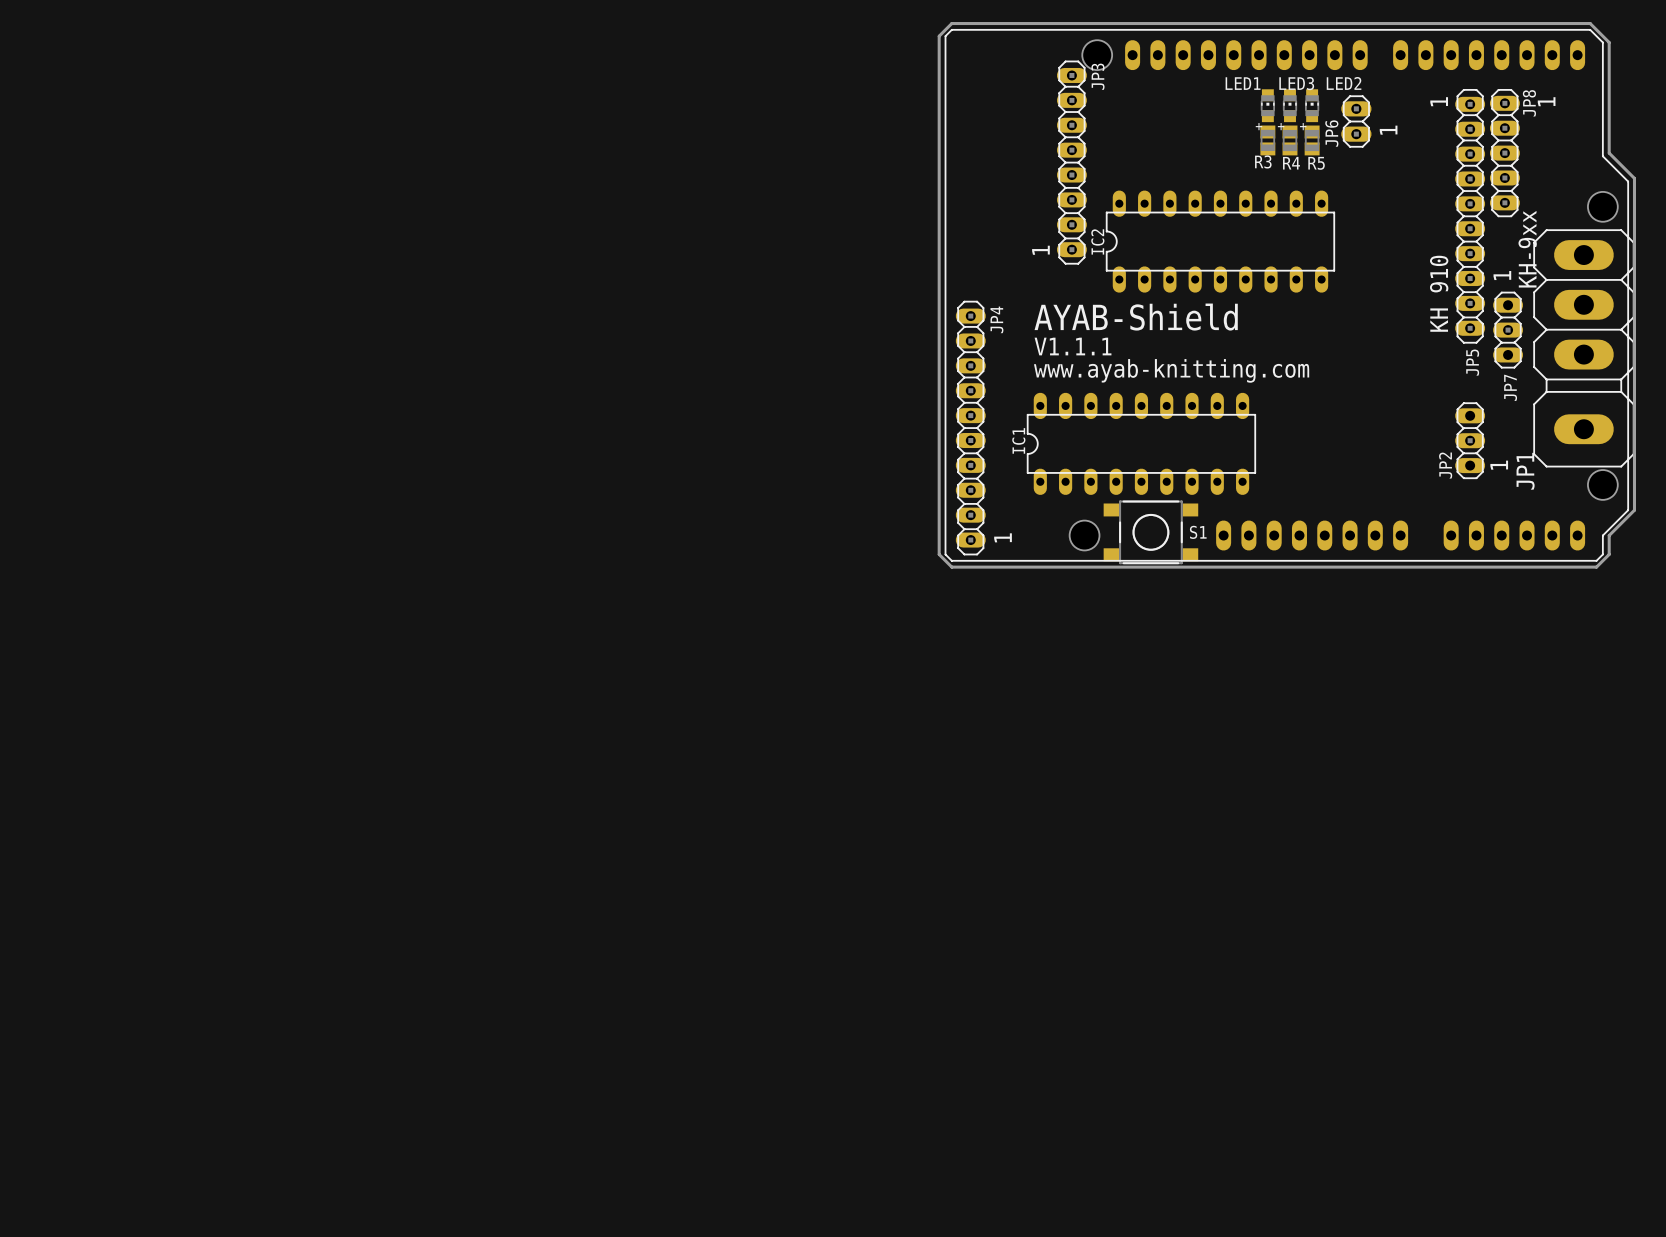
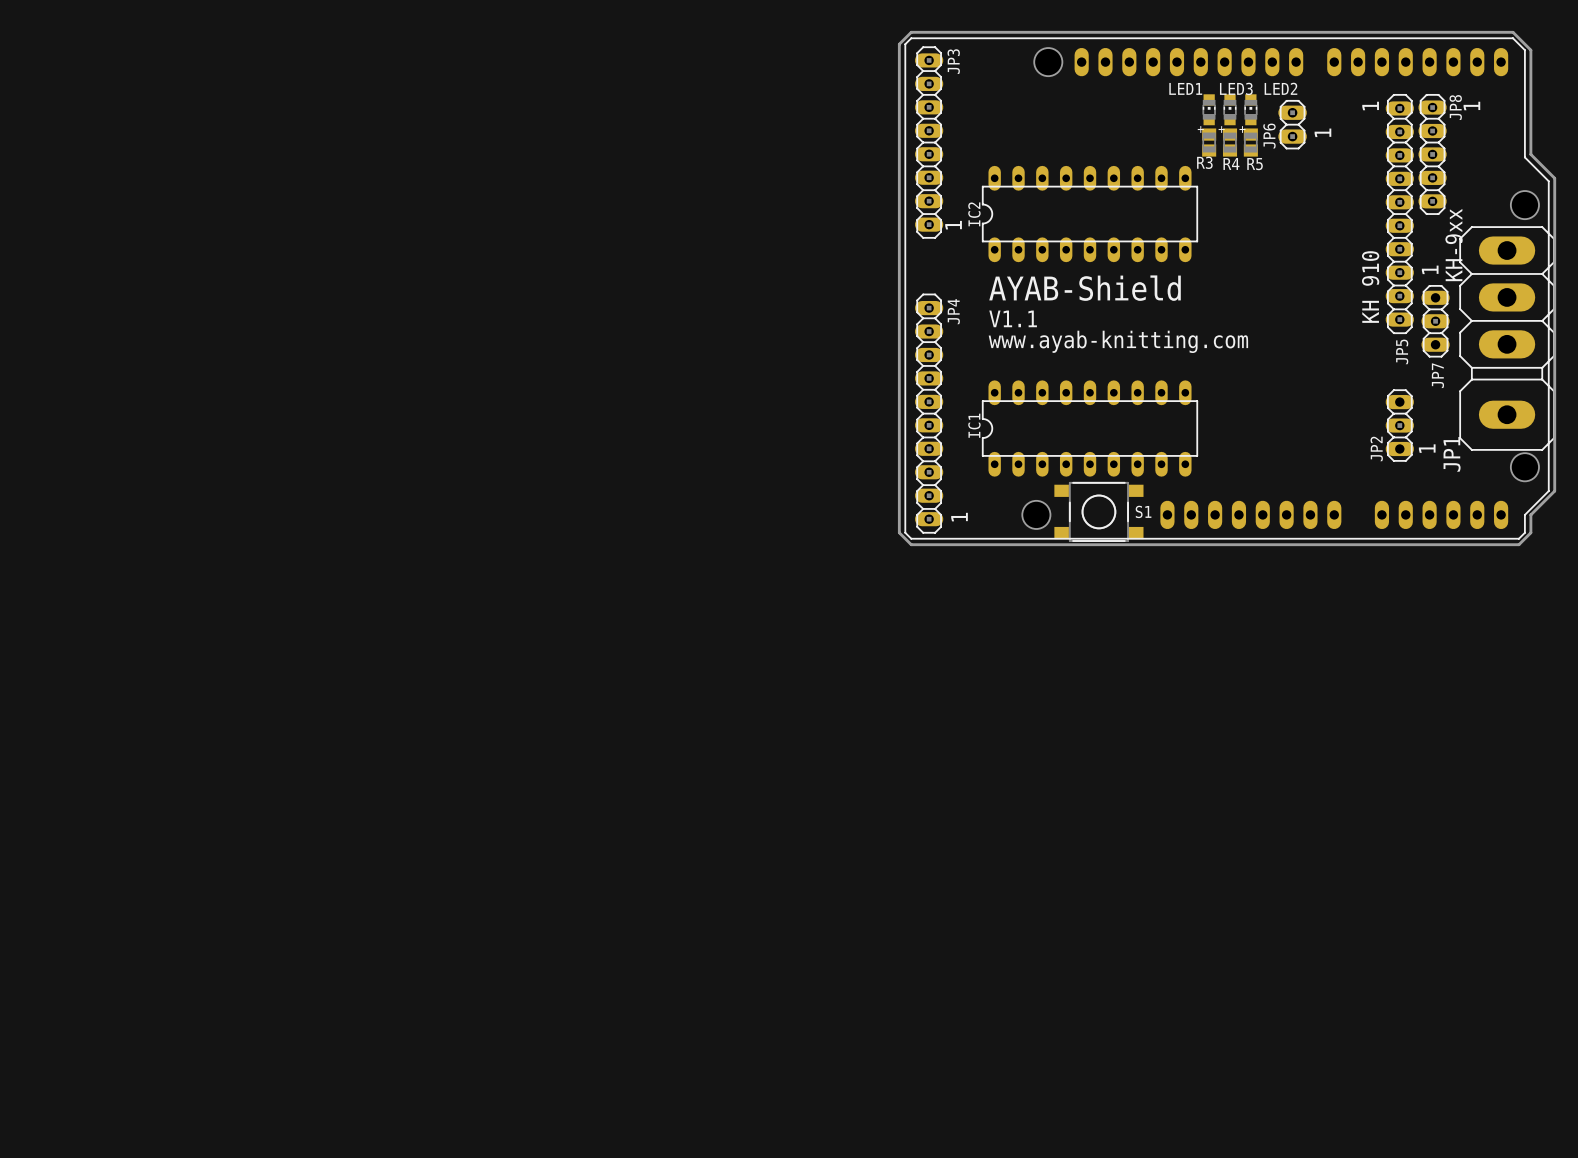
JP3 position: (1071, 162) -> (929, 142)
IC2 position: (1220, 241) -> (1090, 214)
text position: 1 (1040, 250) -> 1 (953, 225)
text: none -> AYAB-Shield (1085, 288)
text: AYAB-Shield (1136, 317) -> V1.1 (1013, 318)
text: V1.1.1 (1073, 346) -> www.ayab-knitting.com (1118, 341)
text: www.ayab-knitting.com (1171, 370) -> none

